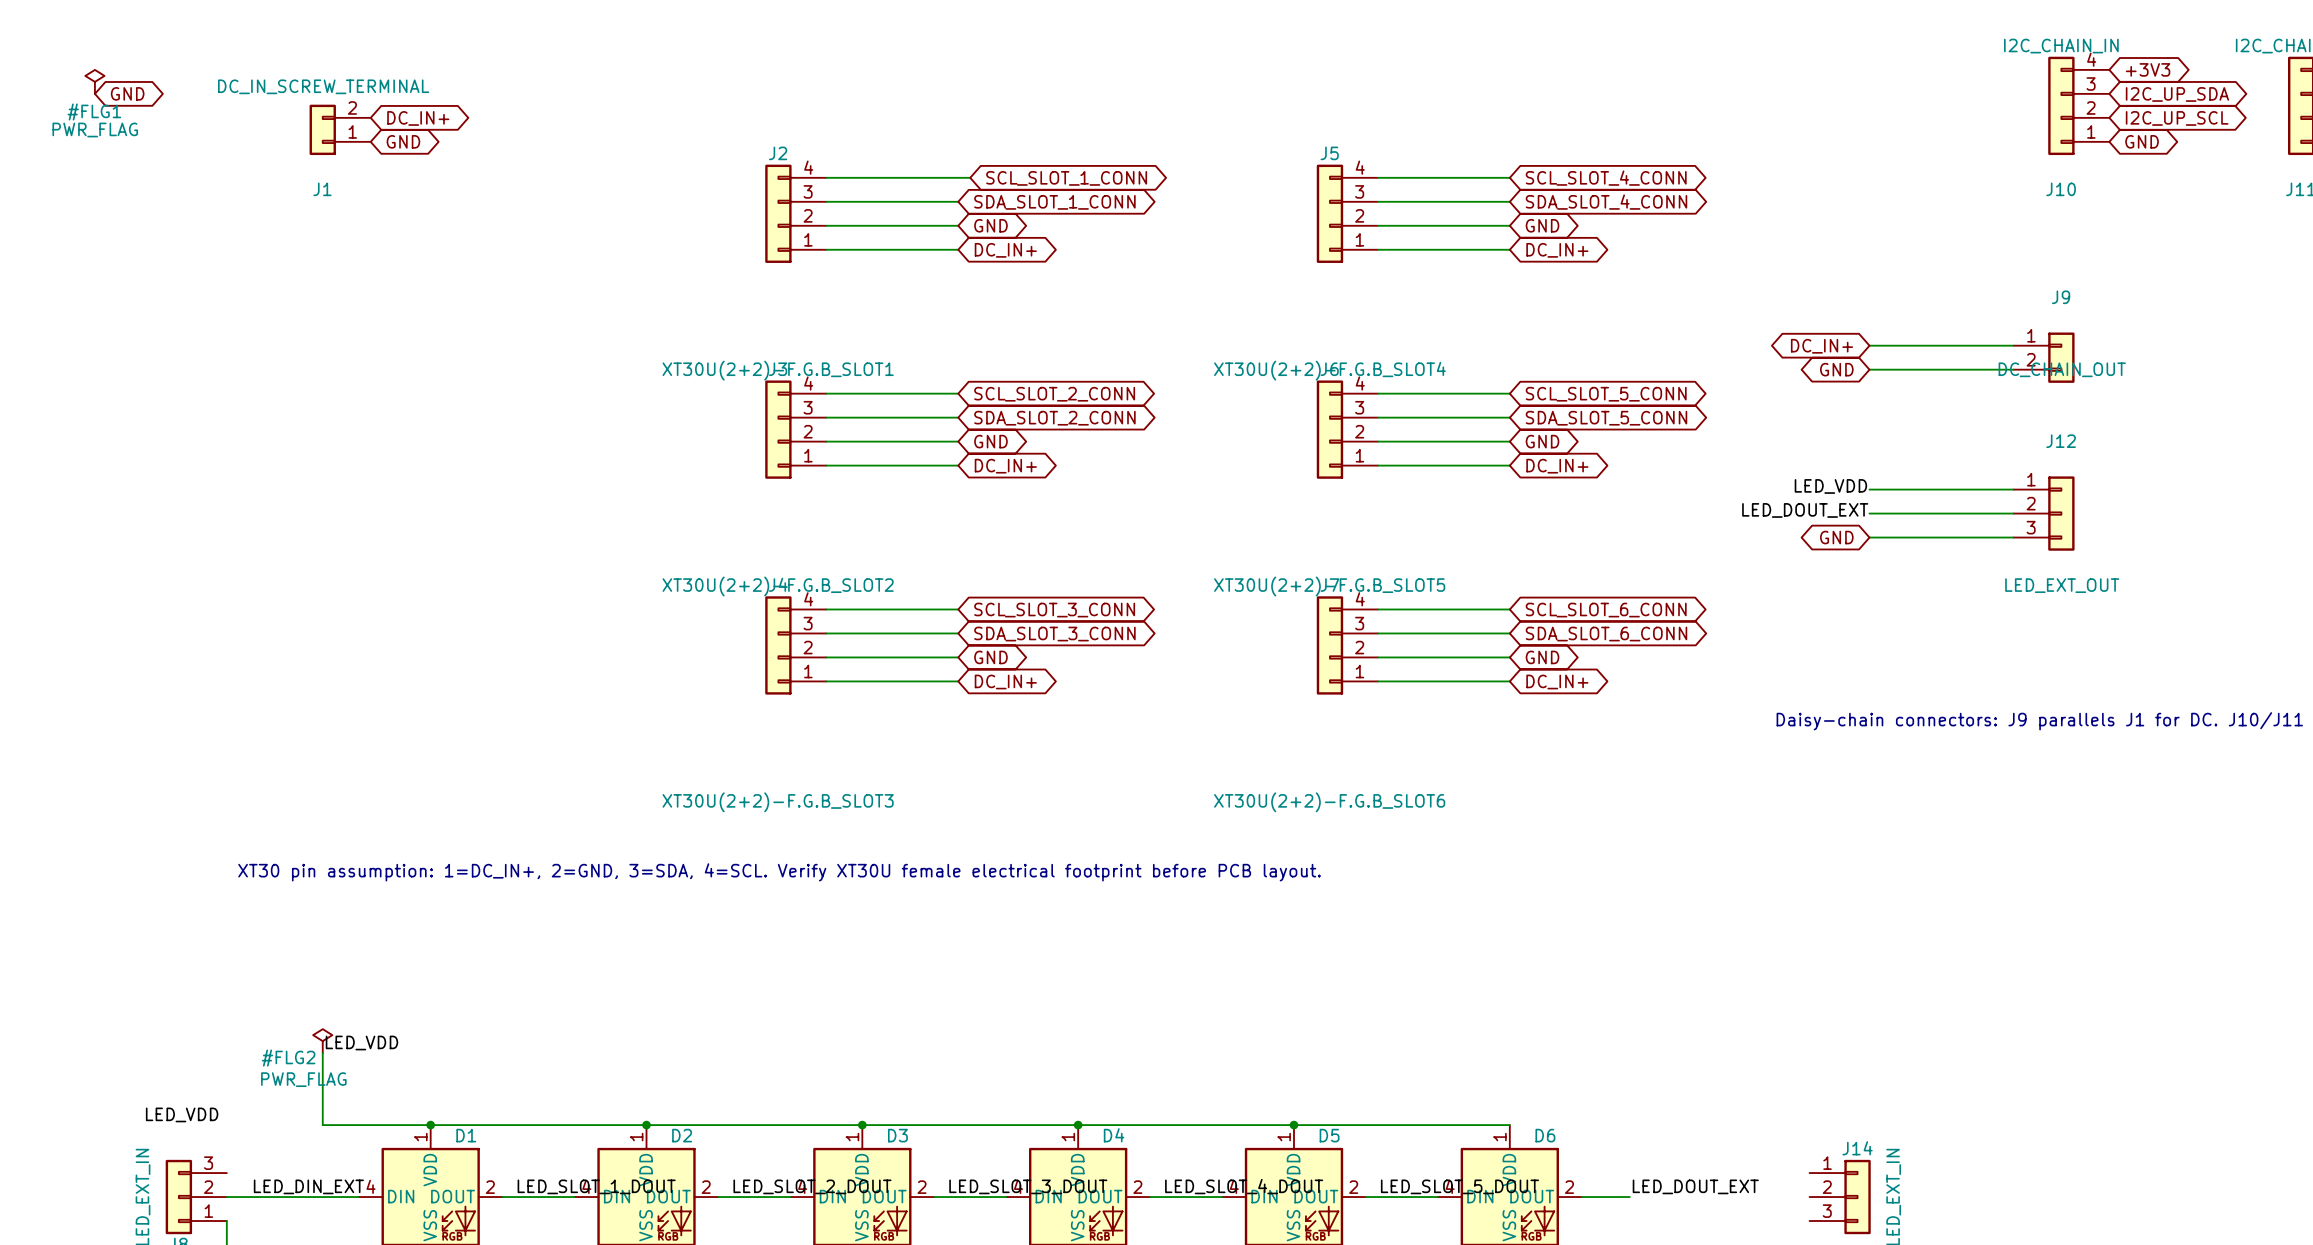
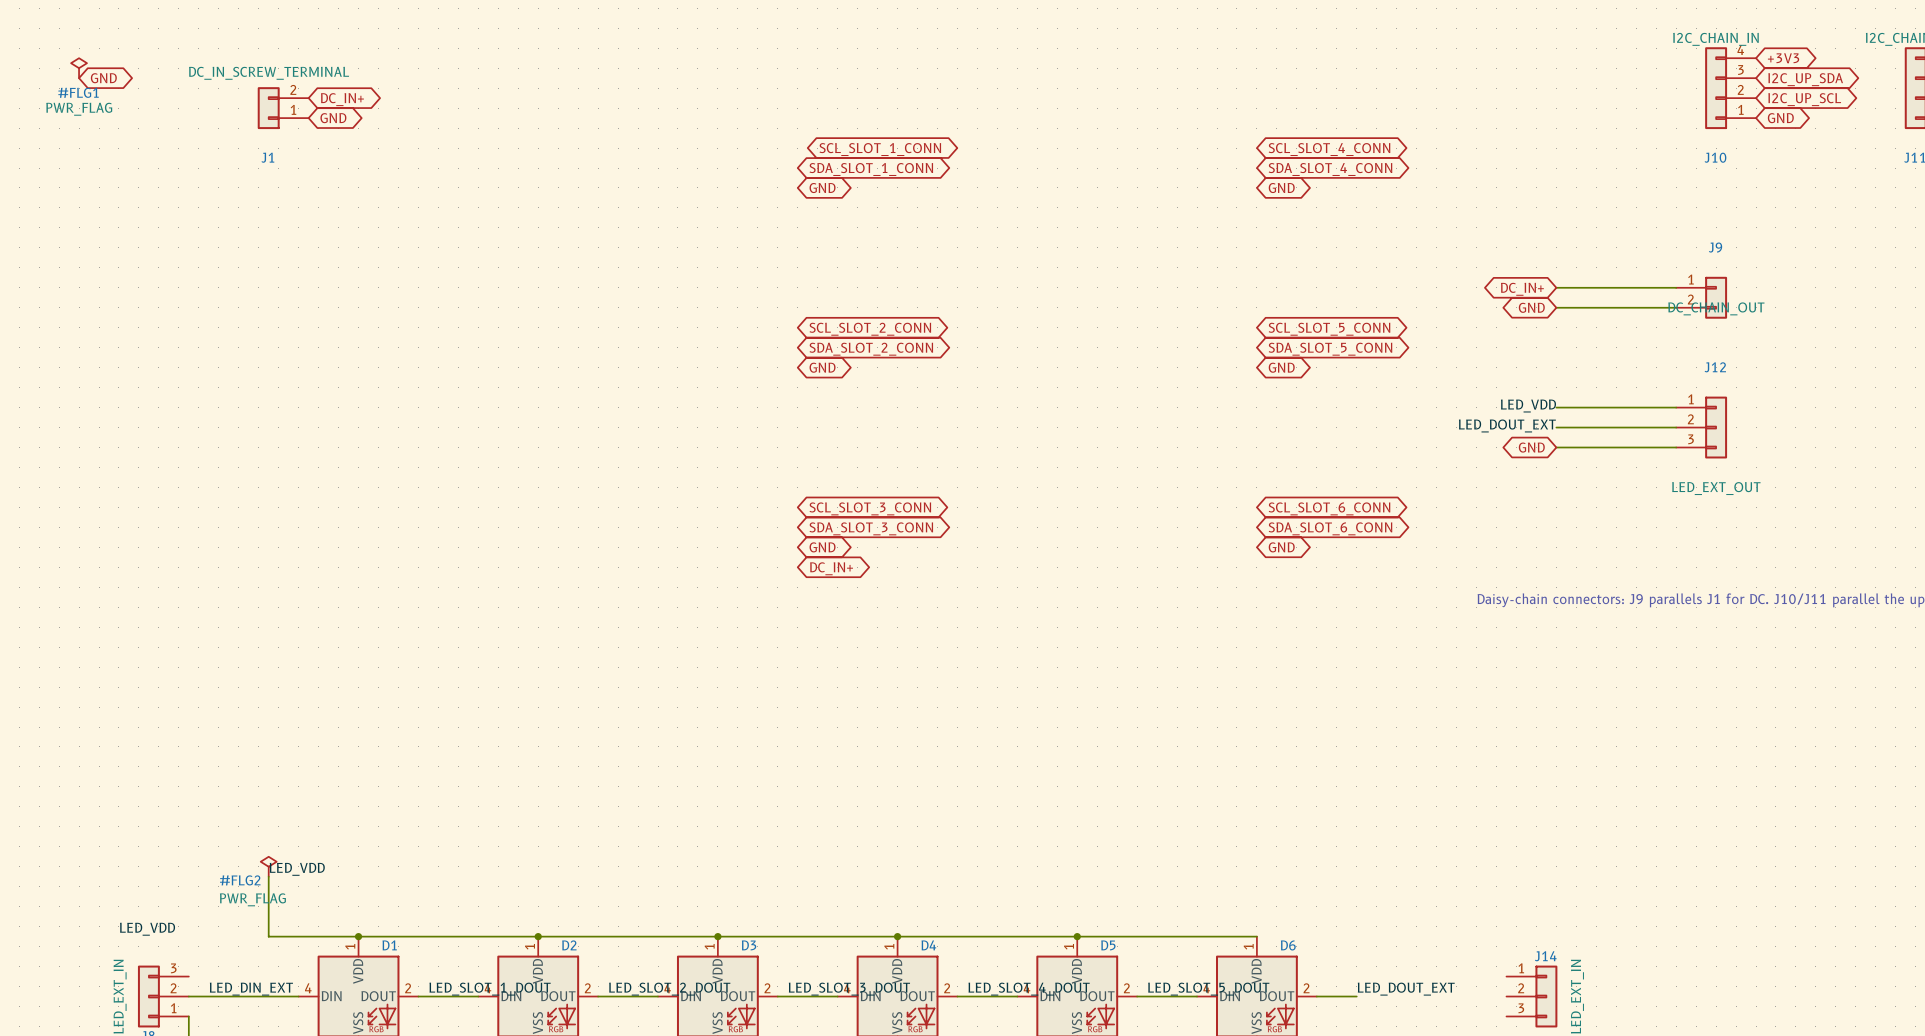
wire: (826, 177) (970, 177) -> none
wire: (1377, 177) (1509, 177) -> none
wire: (826, 201) (958, 201) -> none
wire: (1377, 201) (1509, 201) -> none
J2: XT30U(2+2)-F.G.B_SLOT1 (795, 213) -> none
J5: XT30U(2+2)-F.G.B_SLOT4 (1347, 213) -> none
wire: (826, 225) (958, 225) -> none
wire: (1377, 225) (1509, 225) -> none
wire: (826, 249) (958, 249) -> none
wire: (1377, 249) (1509, 249) -> none
global label: DC_IN+ (1005, 250) -> none
global label: DC_IN+ (1557, 250) -> none
wire: (826, 393) (958, 393) -> none
wire: (1377, 393) (1509, 393) -> none
wire: (826, 417) (958, 417) -> none
wire: (1377, 417) (1509, 417) -> none
J3: XT30U(2+2)-F.G.B_SLOT2 (795, 429) -> none
J6: XT30U(2+2)-F.G.B_SLOT5 (1347, 429) -> none
wire: (826, 441) (958, 441) -> none
wire: (1377, 441) (1509, 441) -> none
wire: (826, 465) (958, 465) -> none
wire: (1377, 465) (1509, 465) -> none
global label: DC_IN+ (1005, 466) -> none
global label: DC_IN+ (1557, 466) -> none
wire: (826, 609) (958, 609) -> none
wire: (1377, 609) (1509, 609) -> none
wire: (826, 633) (958, 633) -> none
wire: (1377, 633) (1509, 633) -> none
J4: XT30U(2+2)-F.G.B_SLOT3 (795, 645) -> none
J7: XT30U(2+2)-F.G.B_SLOT6 (1347, 645) -> none
wire: (826, 657) (958, 657) -> none
wire: (1377, 657) (1509, 657) -> none
wire: (826, 681) (958, 681) -> none
wire: (1377, 681) (1509, 681) -> none
global label: DC_IN+ (1557, 682) -> none
text: XT30 pin assumption: 1=DC_IN+, 2=GND, 3=SDA, 4=SCL. Verify XT30U female electrical footprint before PCB layout. (779, 872) -> none

